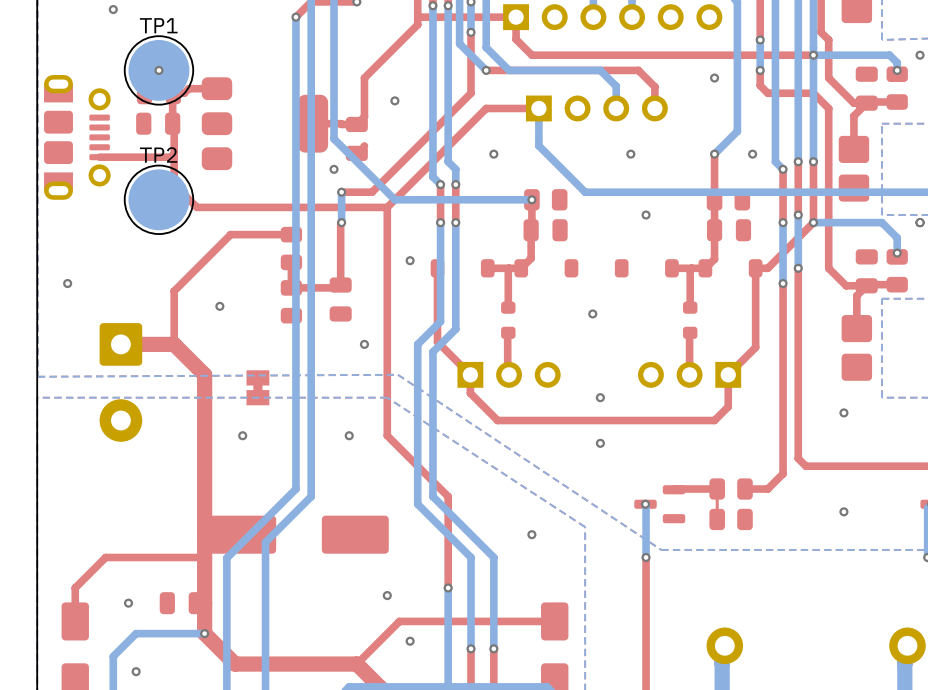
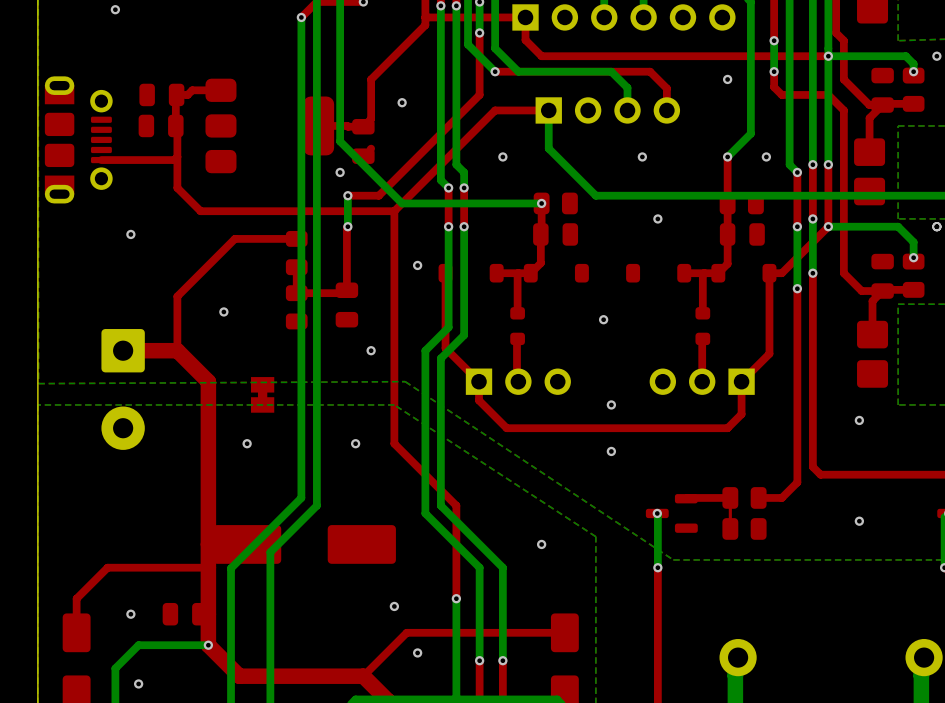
TP1: (158, 70) -> none
via: (158, 70) -> none
TP2: (158, 199) -> none
via position: (67, 283) -> (130, 234)

